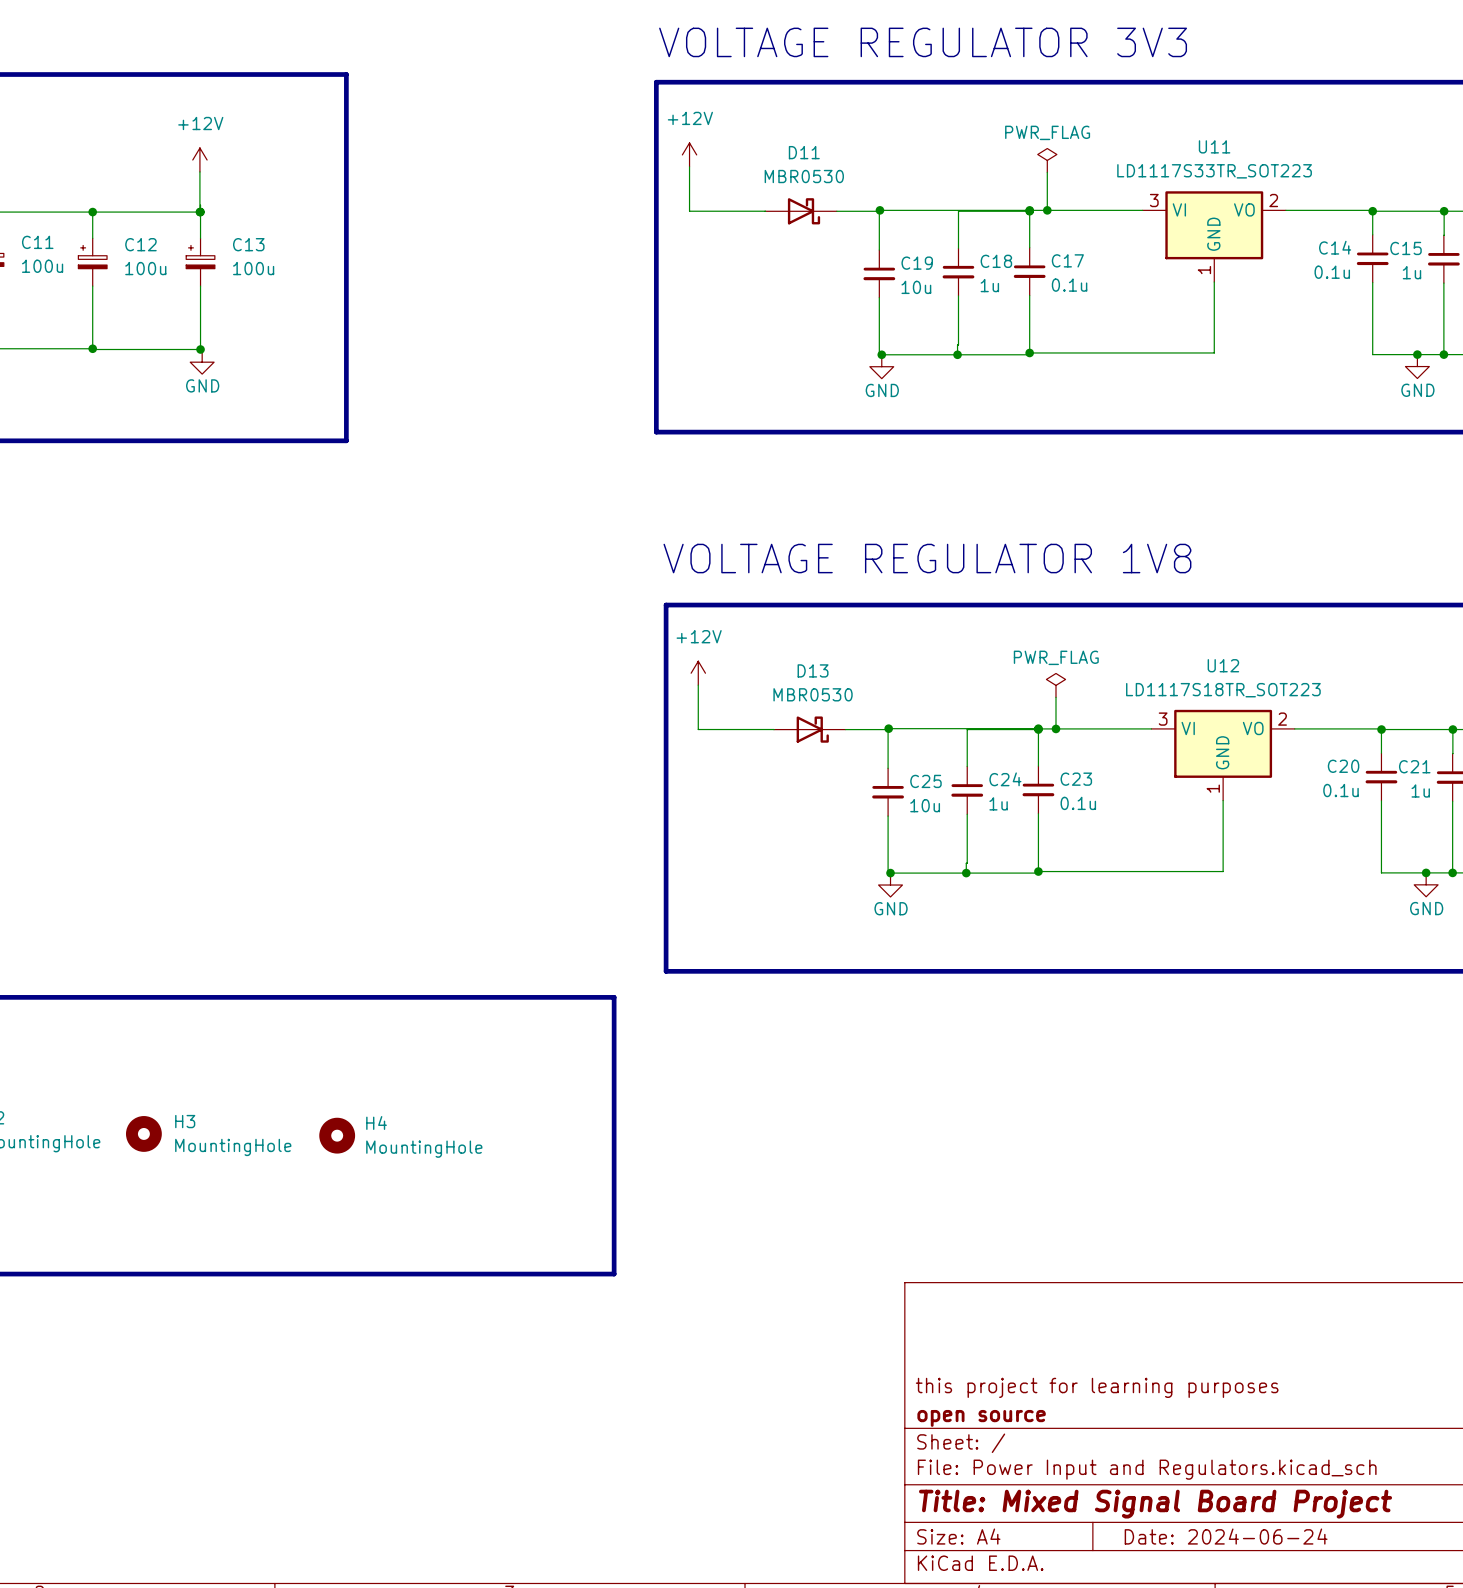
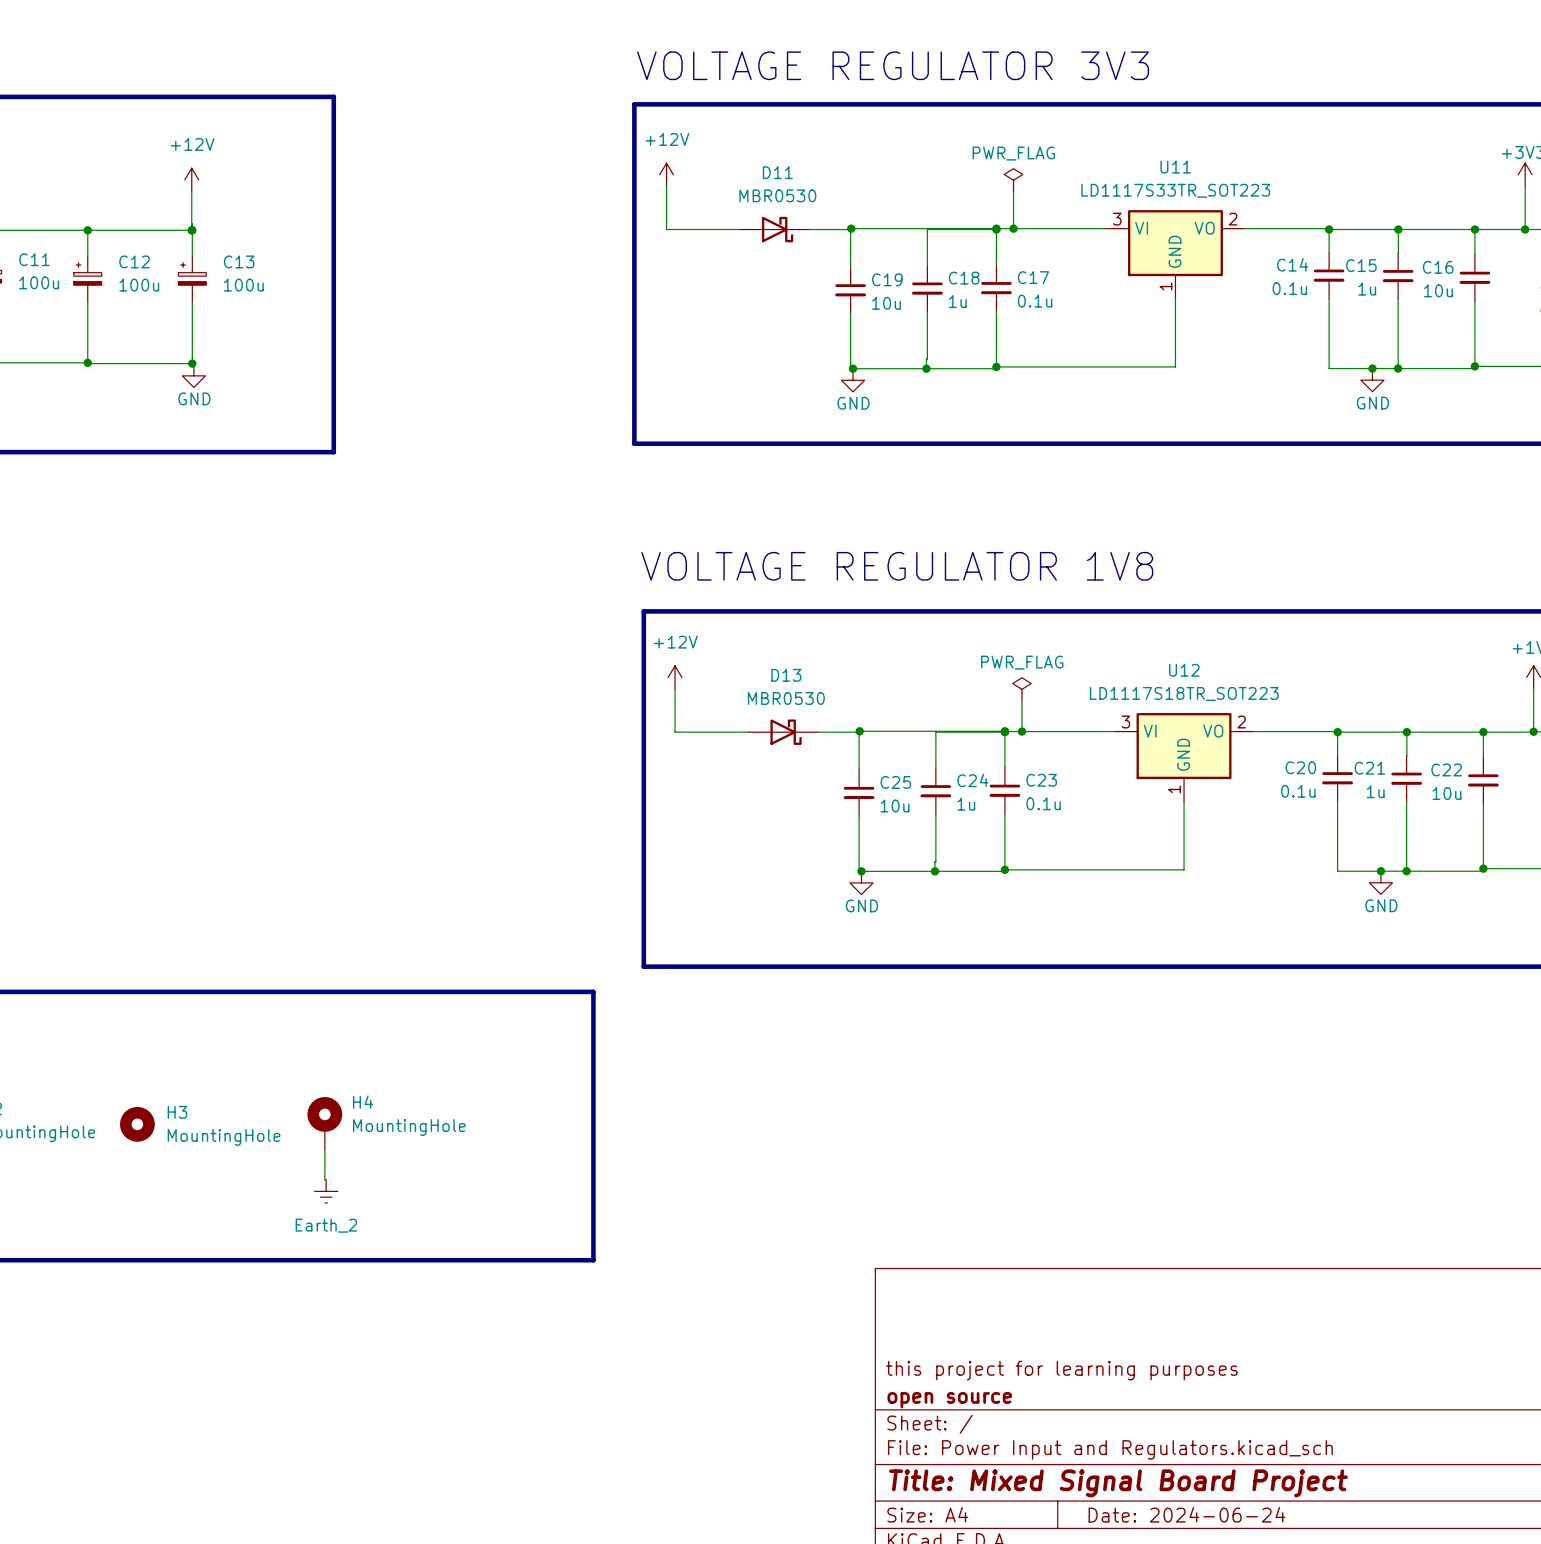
H4 symbol: [319, 1117, 356, 1154] -> [307, 1097, 343, 1150]
wire: none -> (324, 1149) (326, 1179)
power symbol: none -> Earth_2 (326, 1191)

